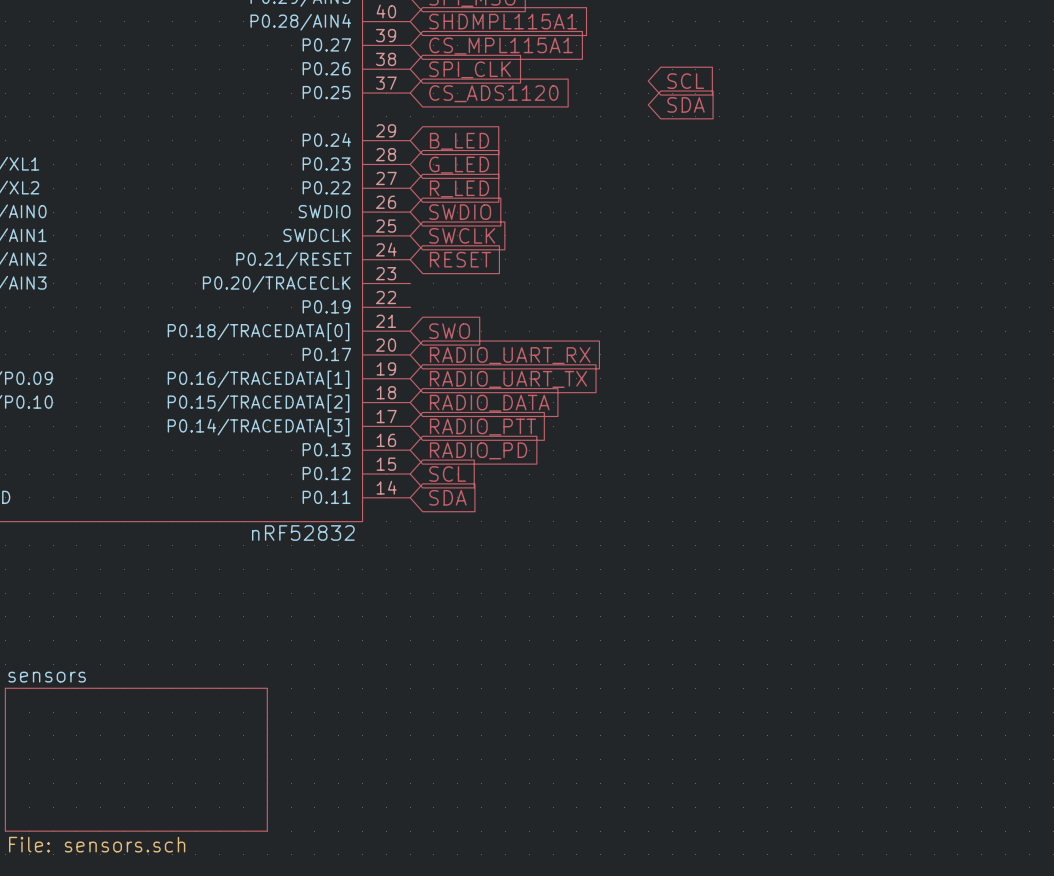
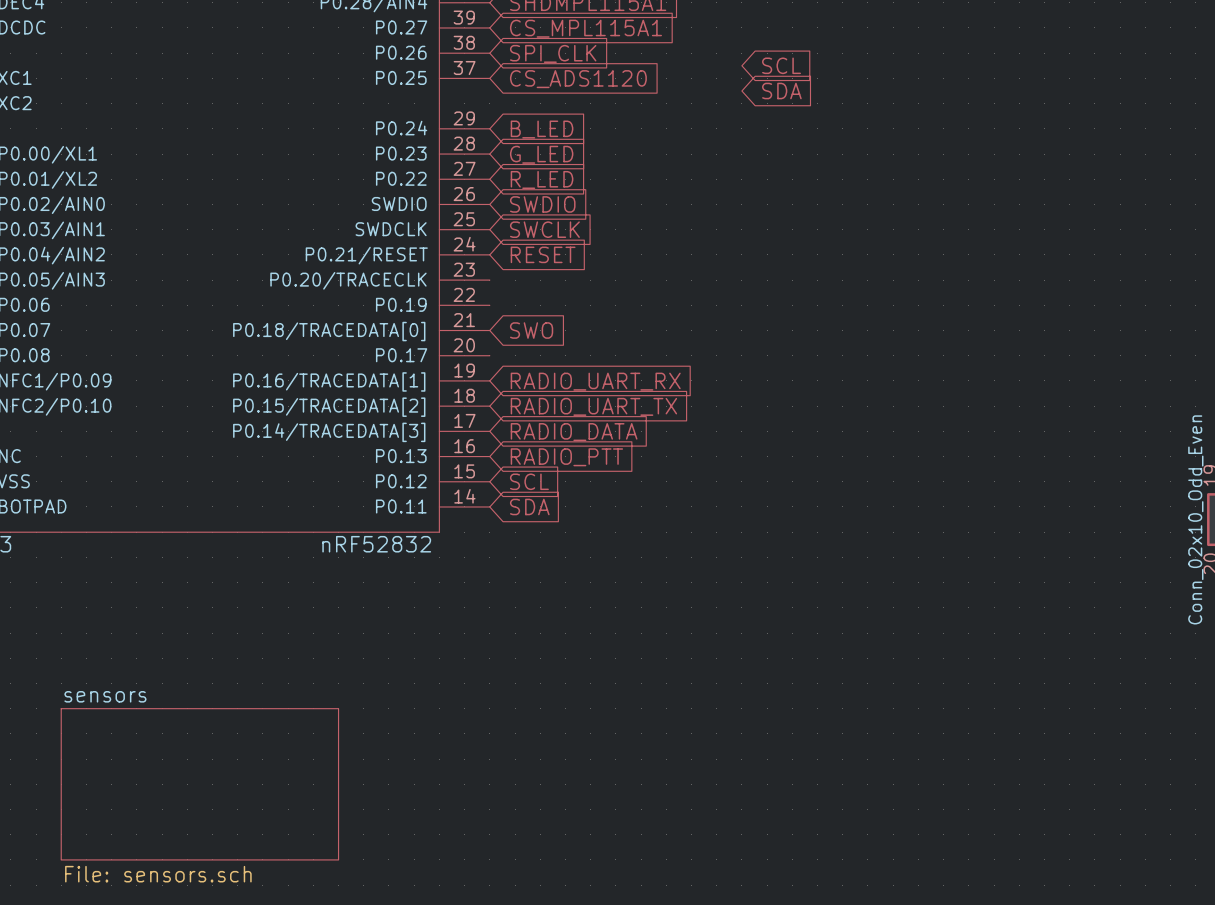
global label: RADIO_UART_RX (510, 355) -> none
global label: RADIO_UART_TX (508, 379) -> RADIO_UART_RX (595, 381)
global label: RADIO_DATA (489, 403) -> RADIO_UART_TX (593, 406)
global label: RADIO_PTT (482, 427) -> RADIO_DATA (574, 432)
global label: RADIO_PD (478, 450) -> RADIO_PTT (566, 457)

